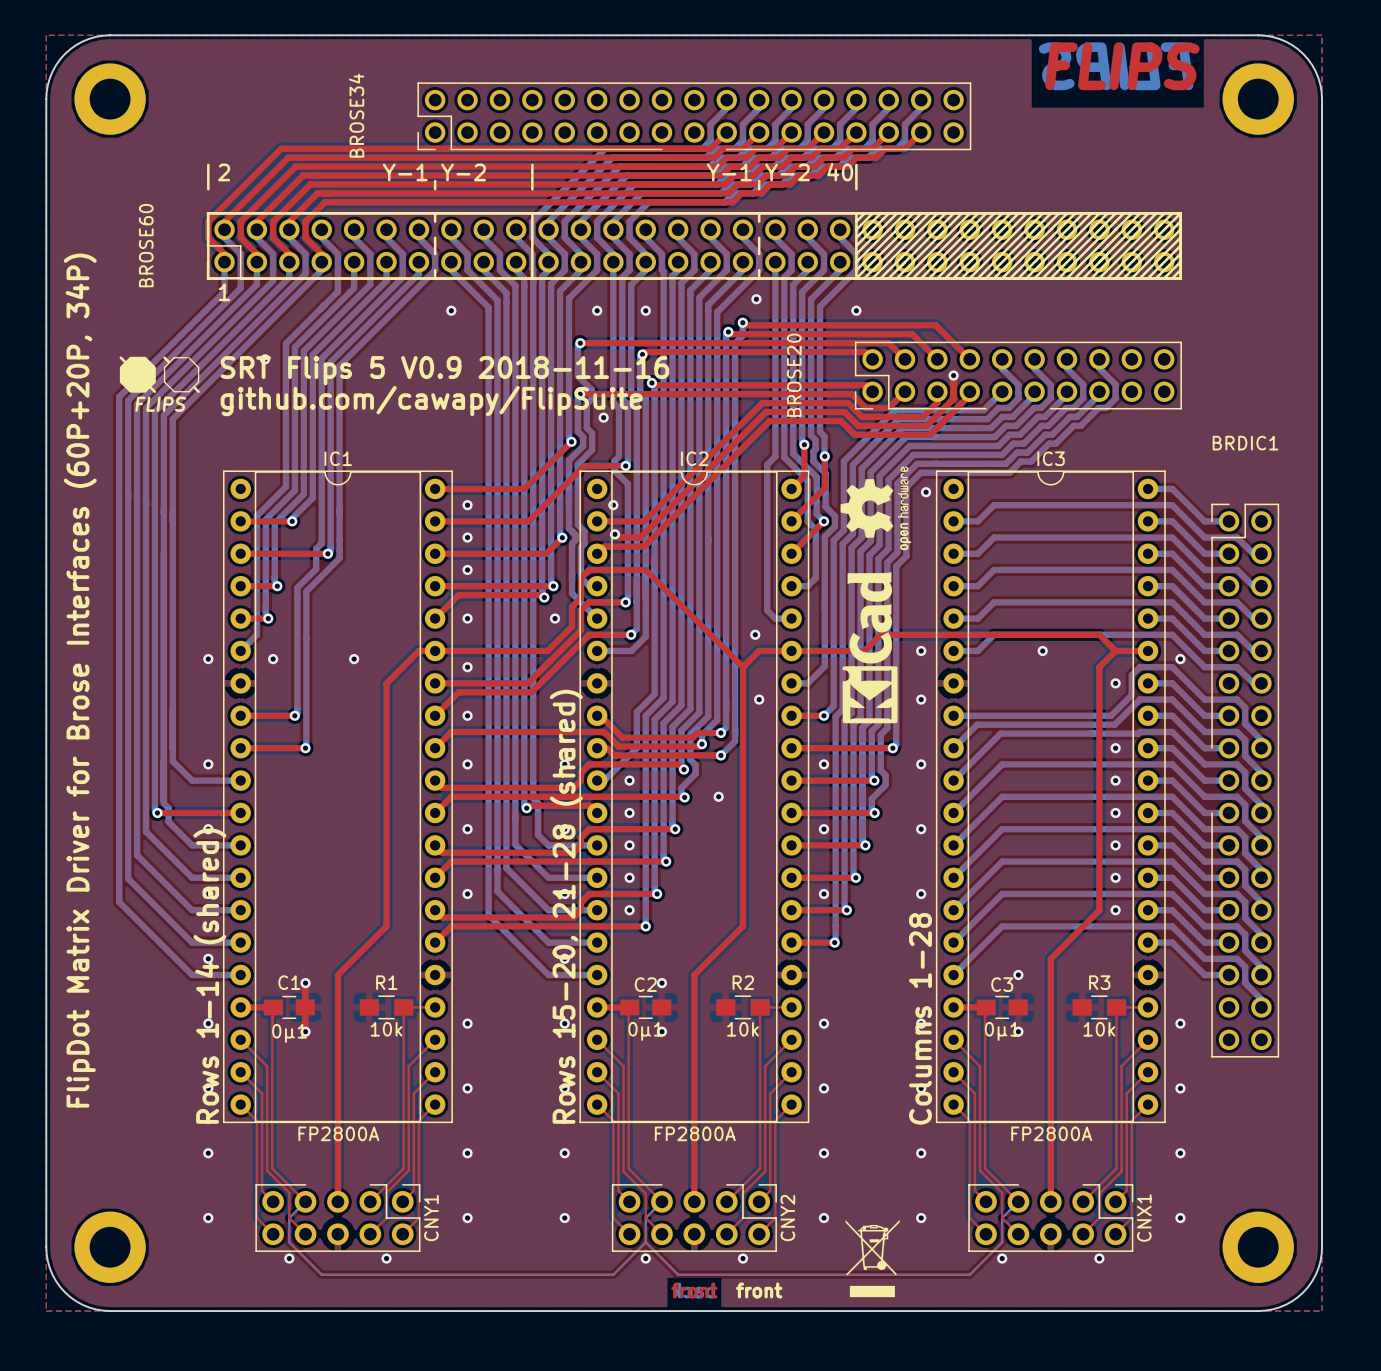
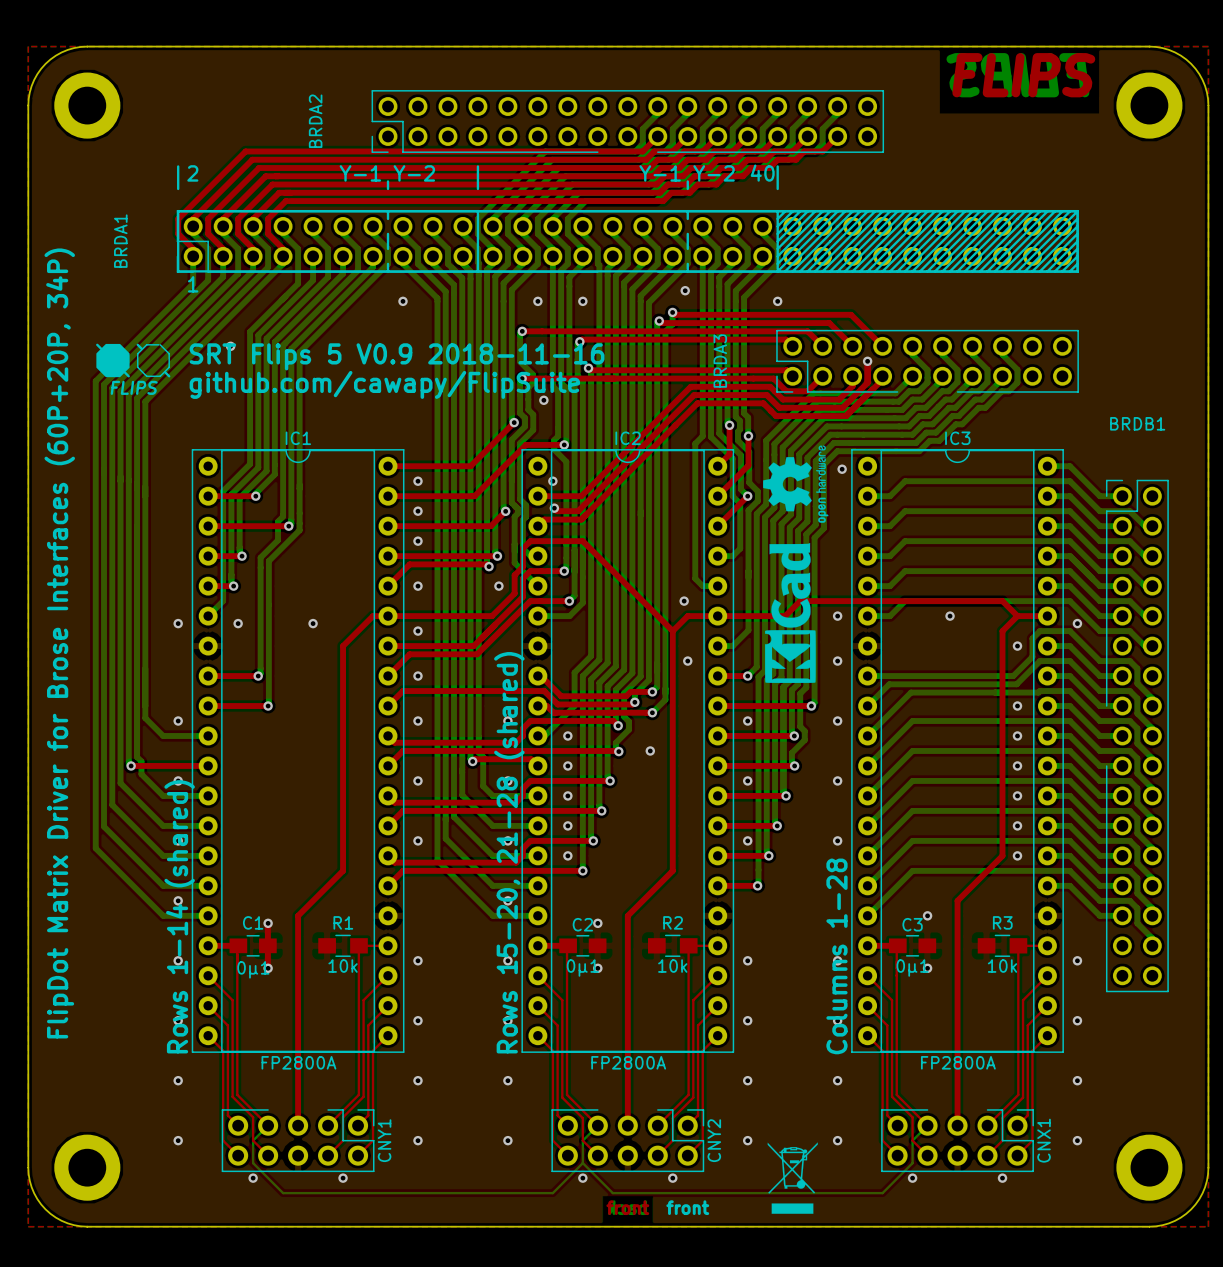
BROSE34 name: BROSE34 (356, 115) -> BRDA2 (315, 121)
BROSE60 name: BROSE60 (146, 245) -> BRDA1 (120, 241)
BROSE20 name: BROSE20 (794, 375) -> BRDA3 (720, 361)
BRDIC1 name: BRDIC1 (1245, 443) -> BRDB1 (1137, 423)

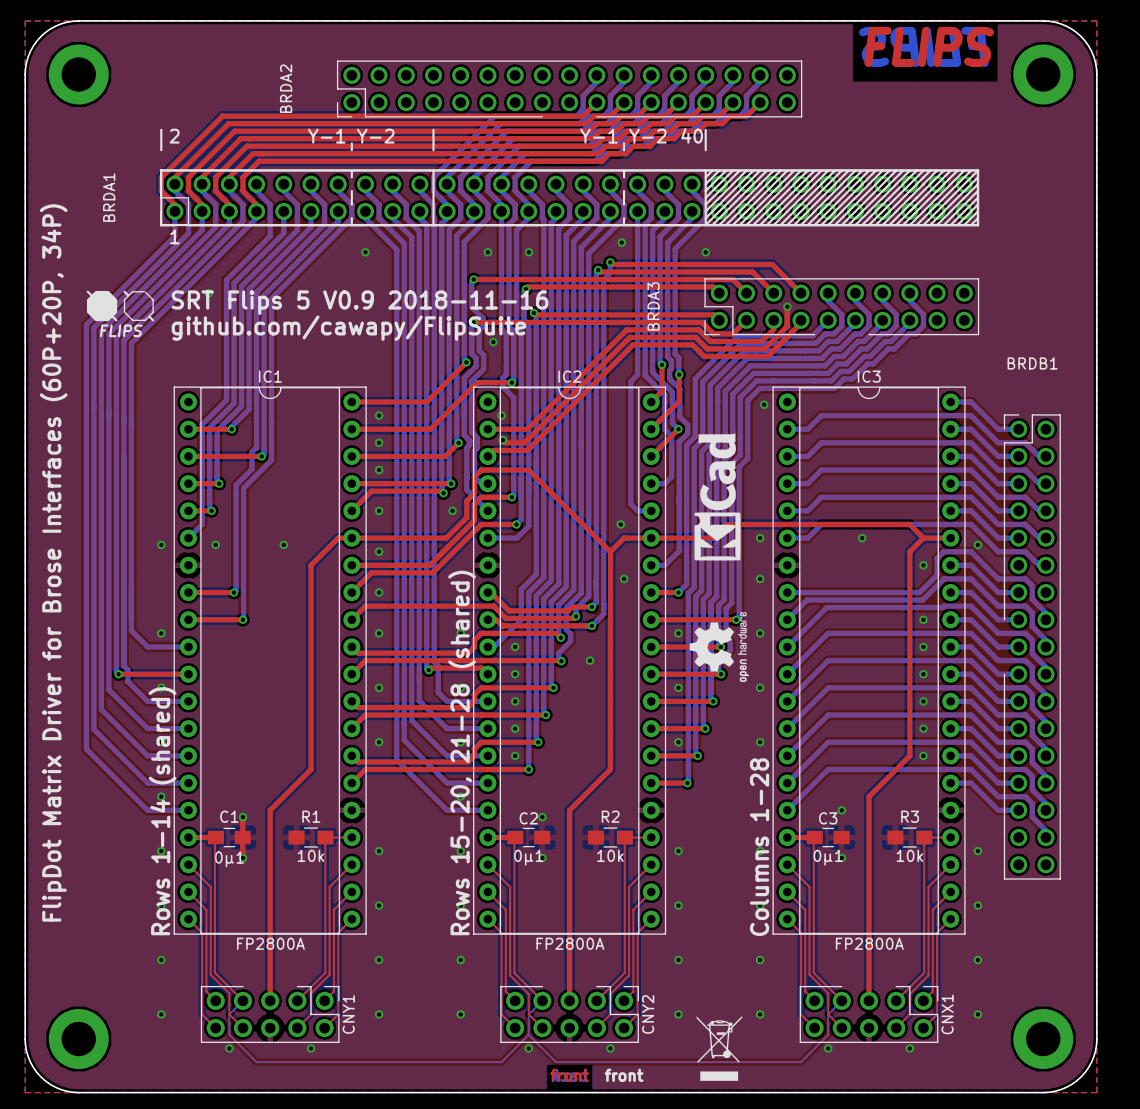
drawing position: (795, 484) -> (719, 646)
drawing position: (790, 612) -> (717, 496)

